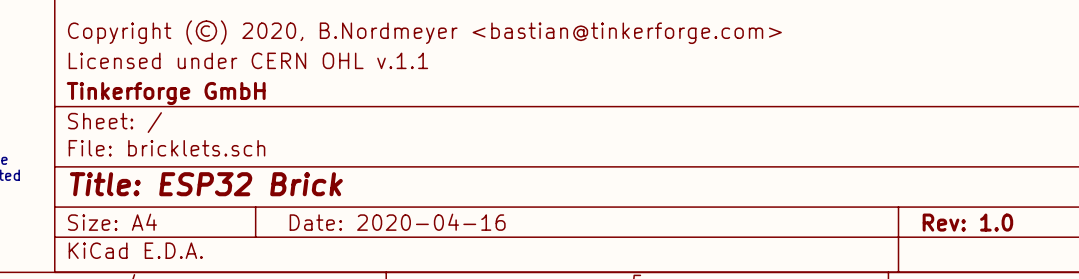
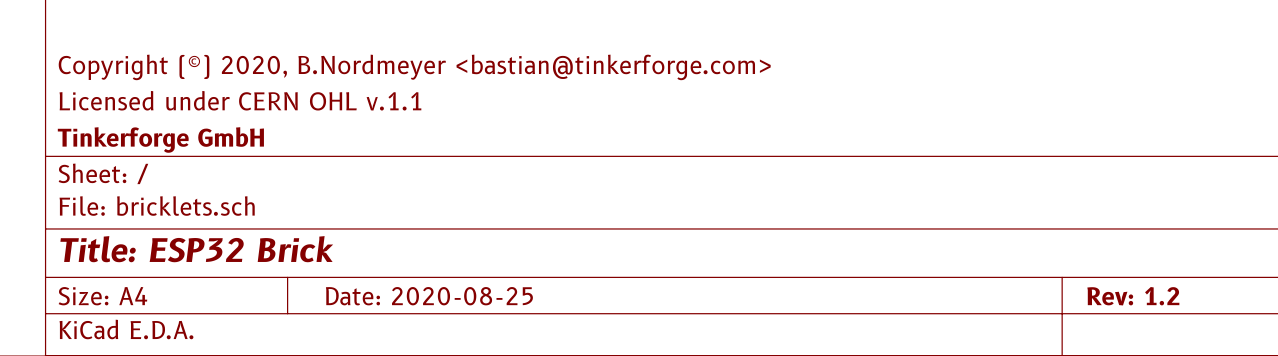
title block: Date: 2020-04-16 (397, 222) -> Date: 2020-08-25 (429, 296)
title block: Rev: 1.0 (967, 222) -> Rev: 1.2 (1133, 296)

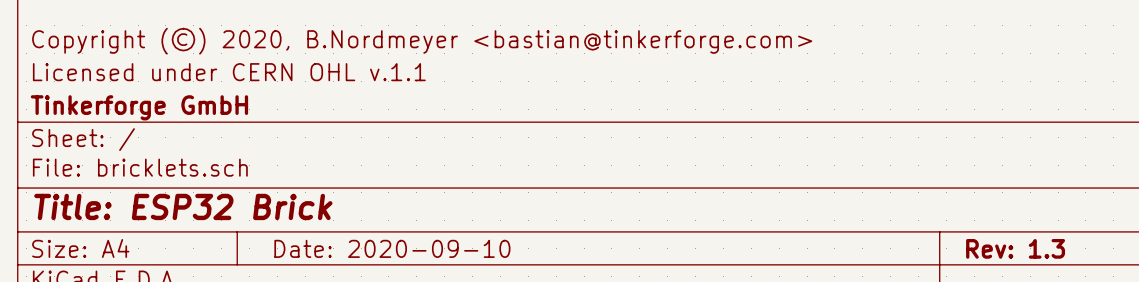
title block: Date: 2020-08-25 (429, 296) -> Date: 2020-09-10 (392, 248)
title block: Rev: 1.2 (1133, 296) -> Rev: 1.3 (1015, 248)

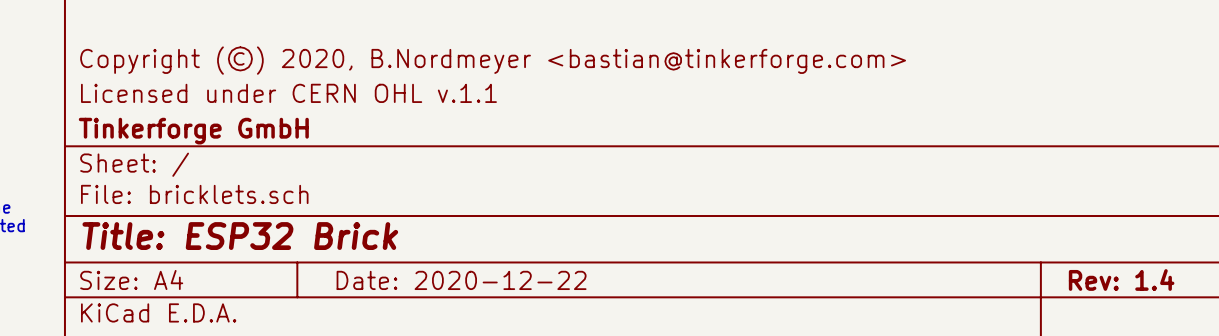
title block: Date: 2020-09-10 (392, 248) -> Date: 2020-12-22 (461, 280)
title block: Rev: 1.3 (1015, 248) -> Rev: 1.4 (1121, 280)

